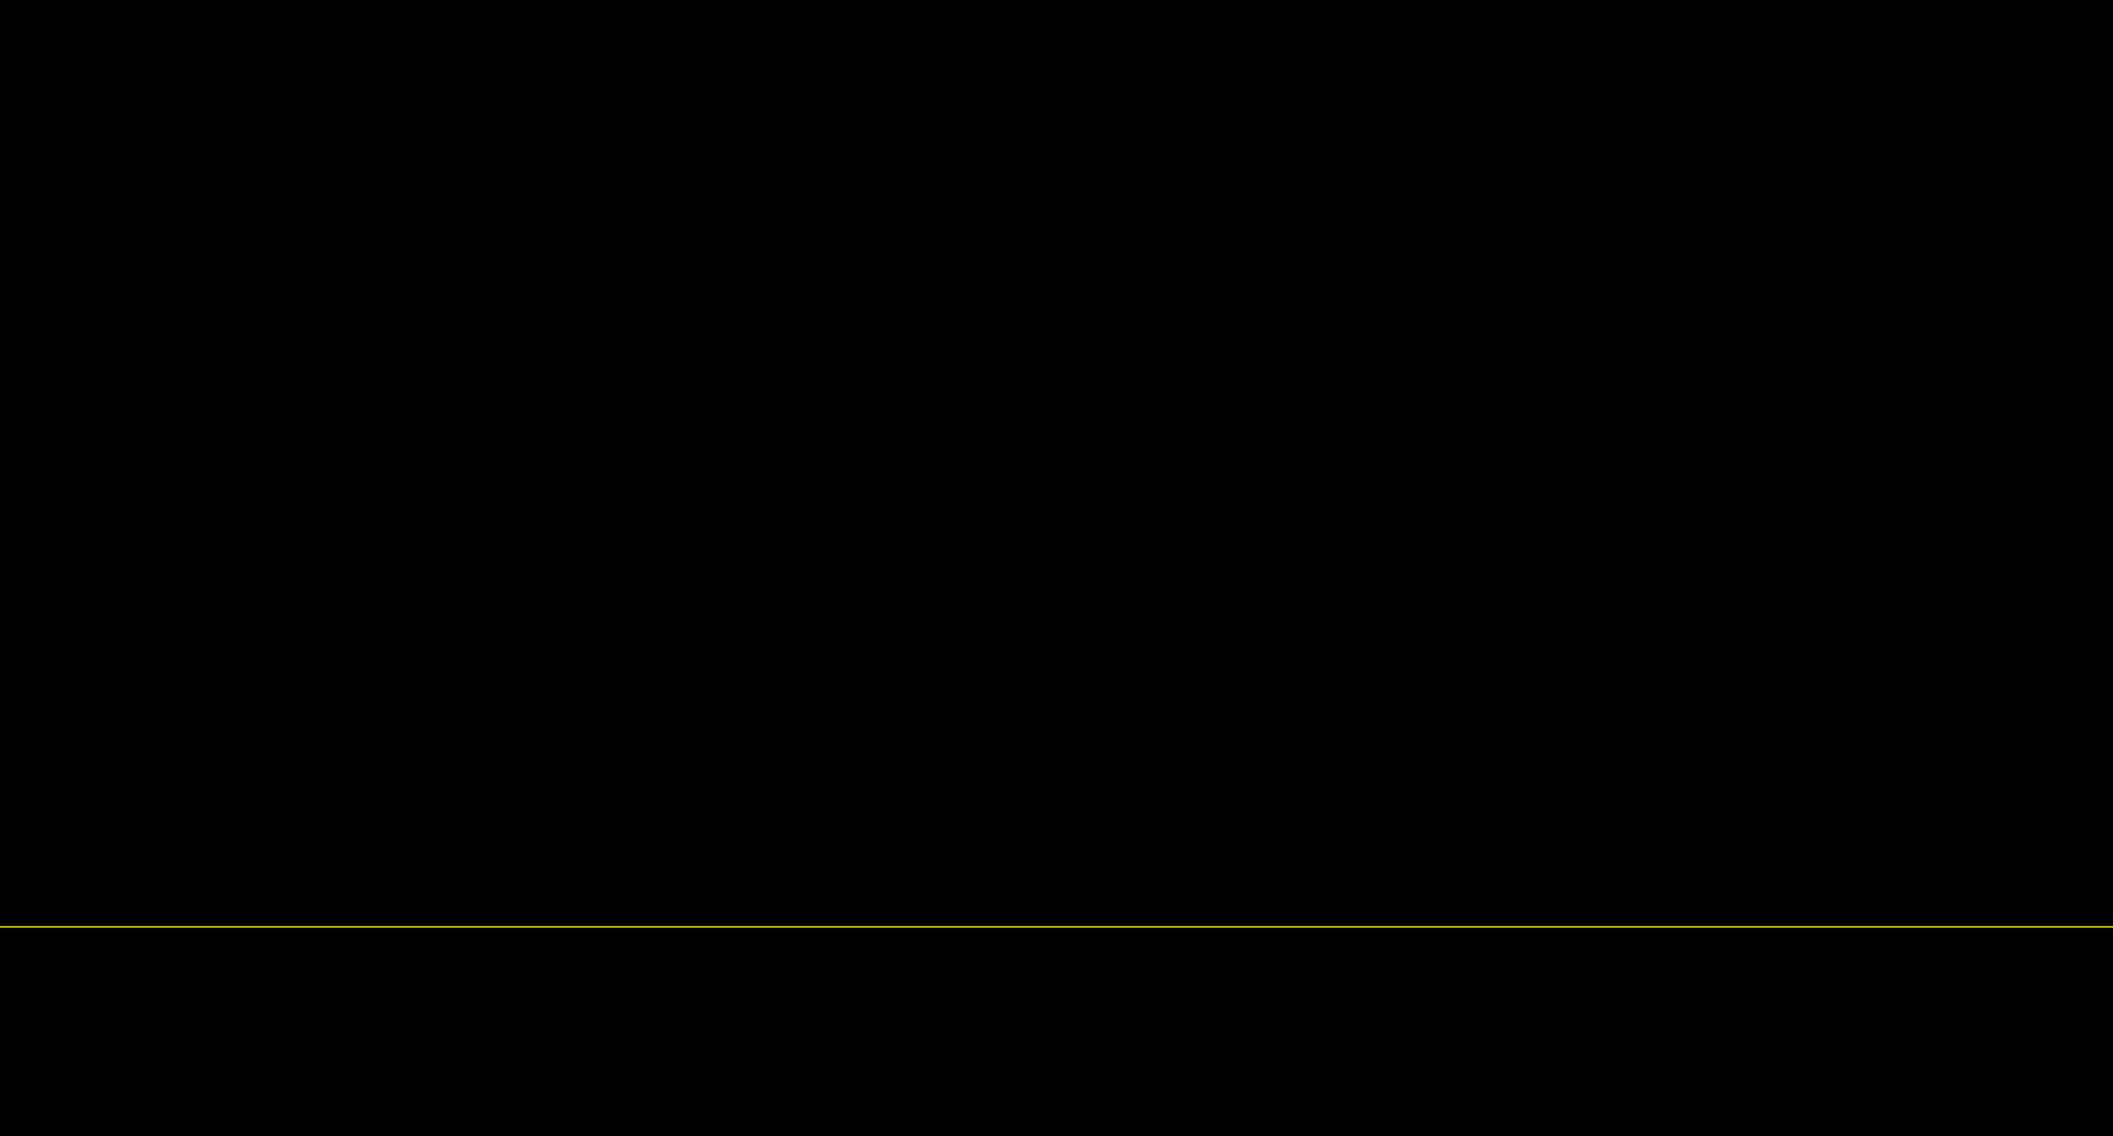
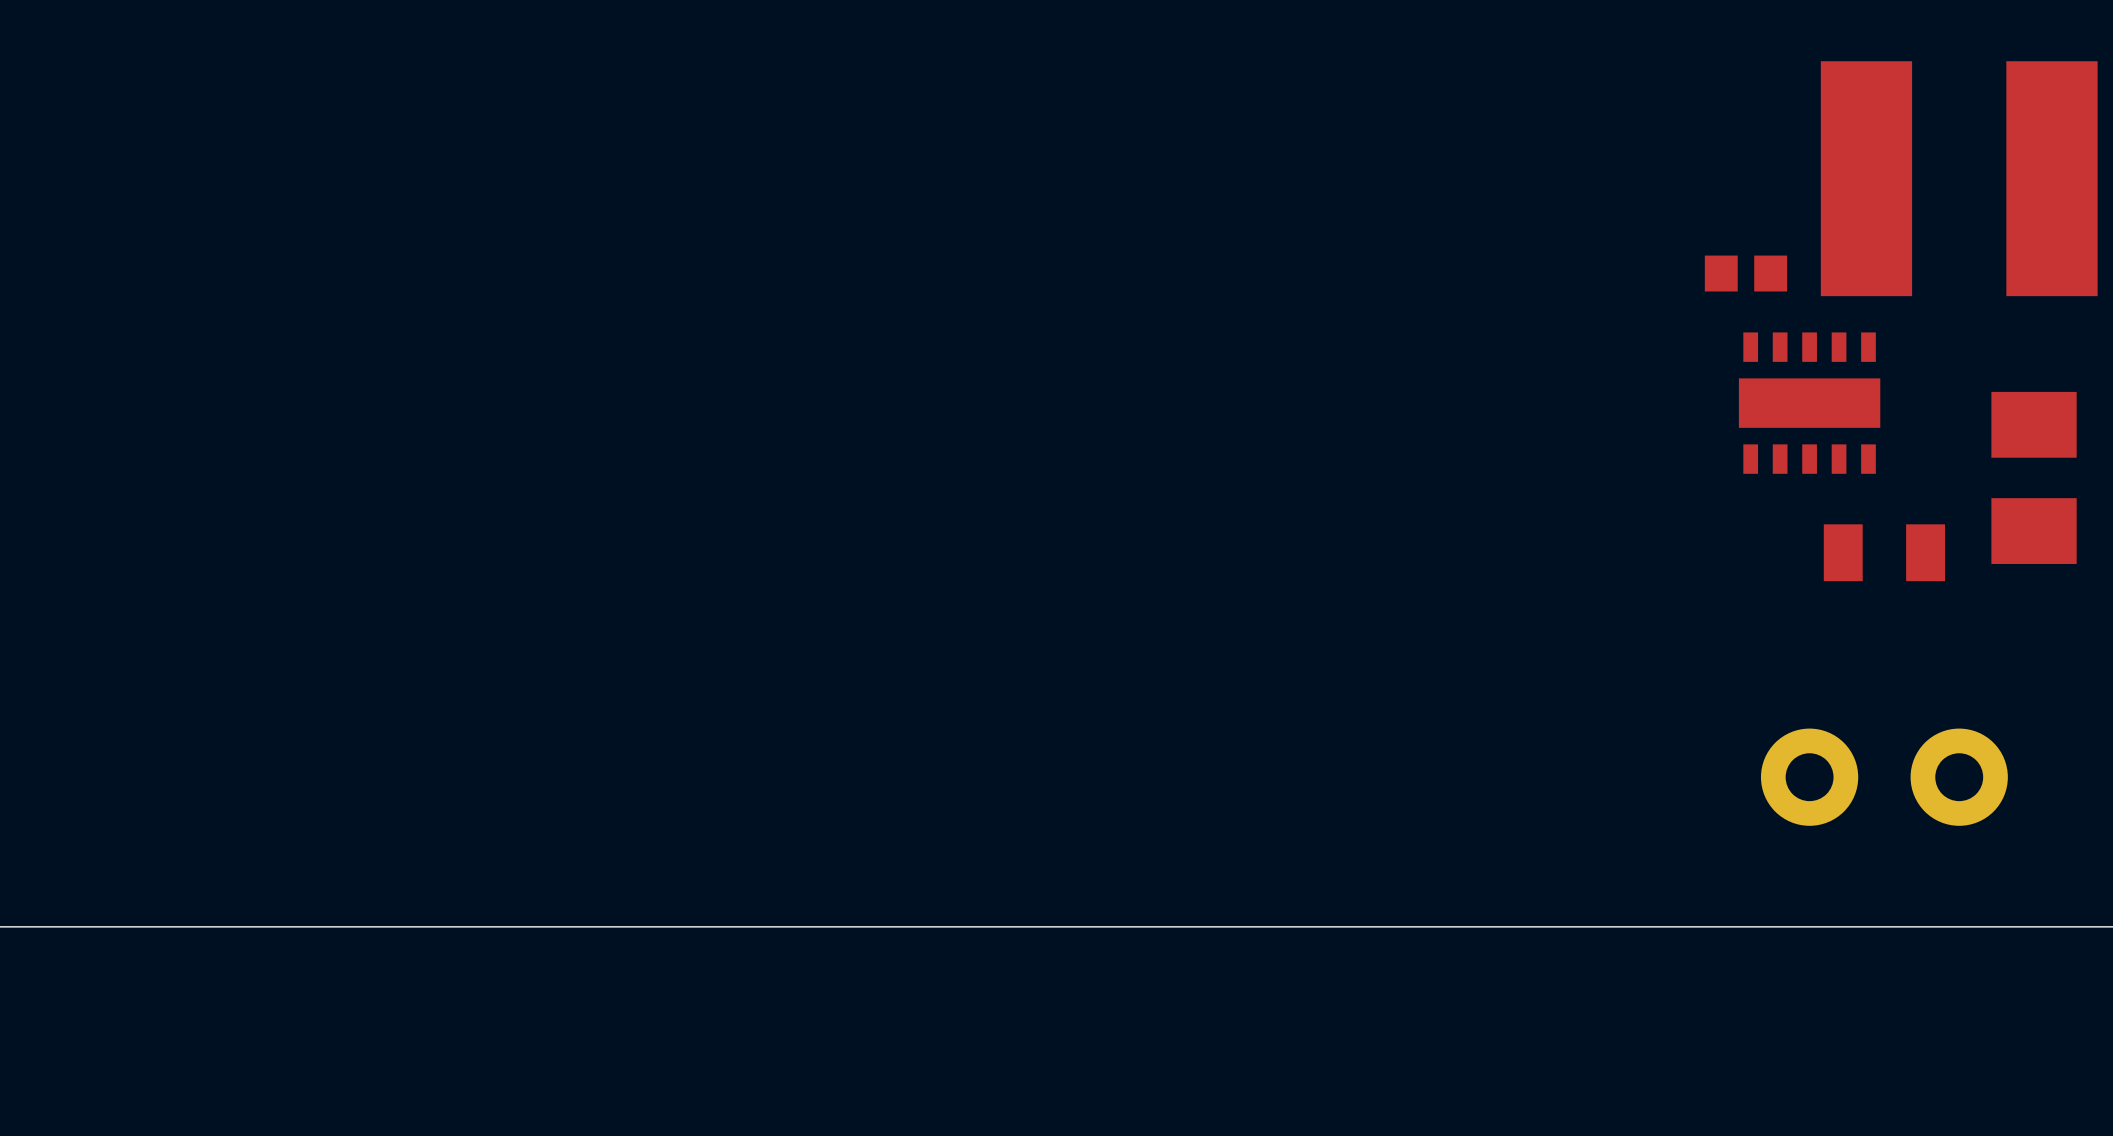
part: none -> (1959, 178)
part: none -> (1745, 273)
part: none -> (1809, 403)
part: none -> (2034, 477)
part: none -> (1884, 552)
part: none -> (1809, 777)
part: none -> (1959, 777)

